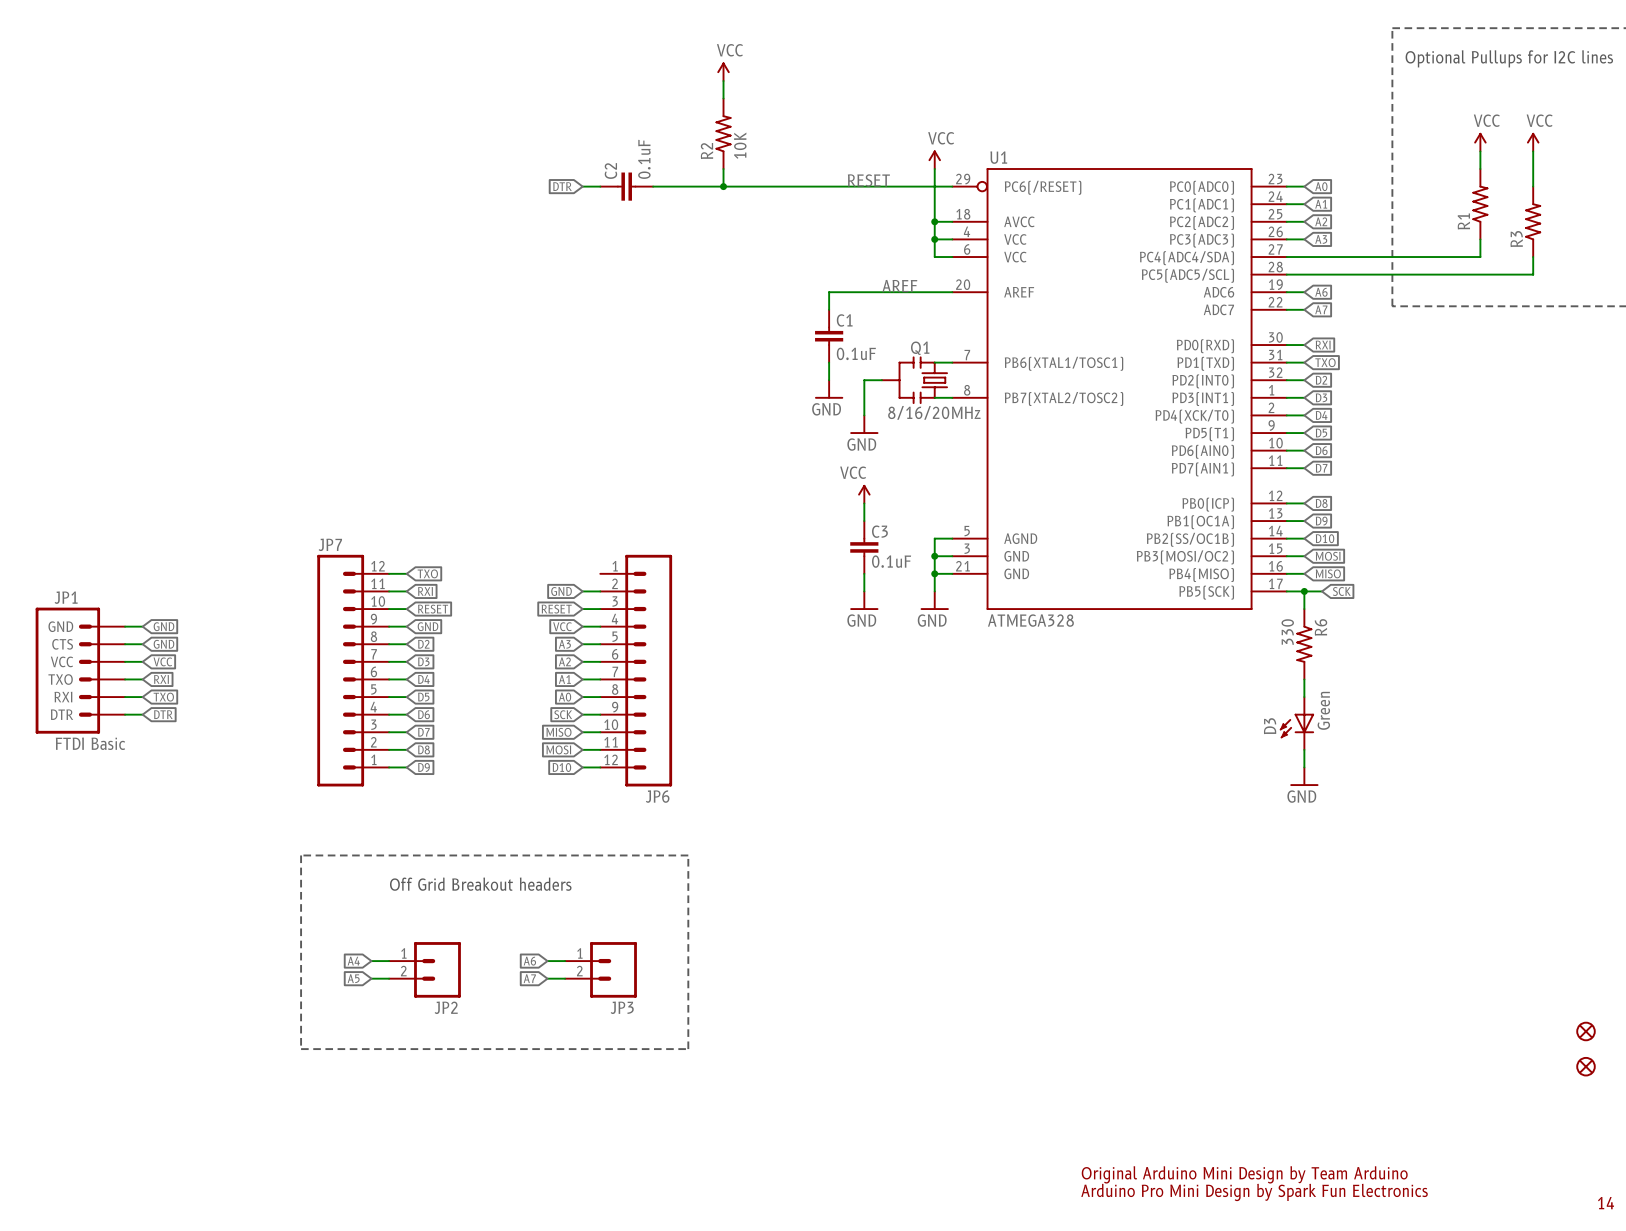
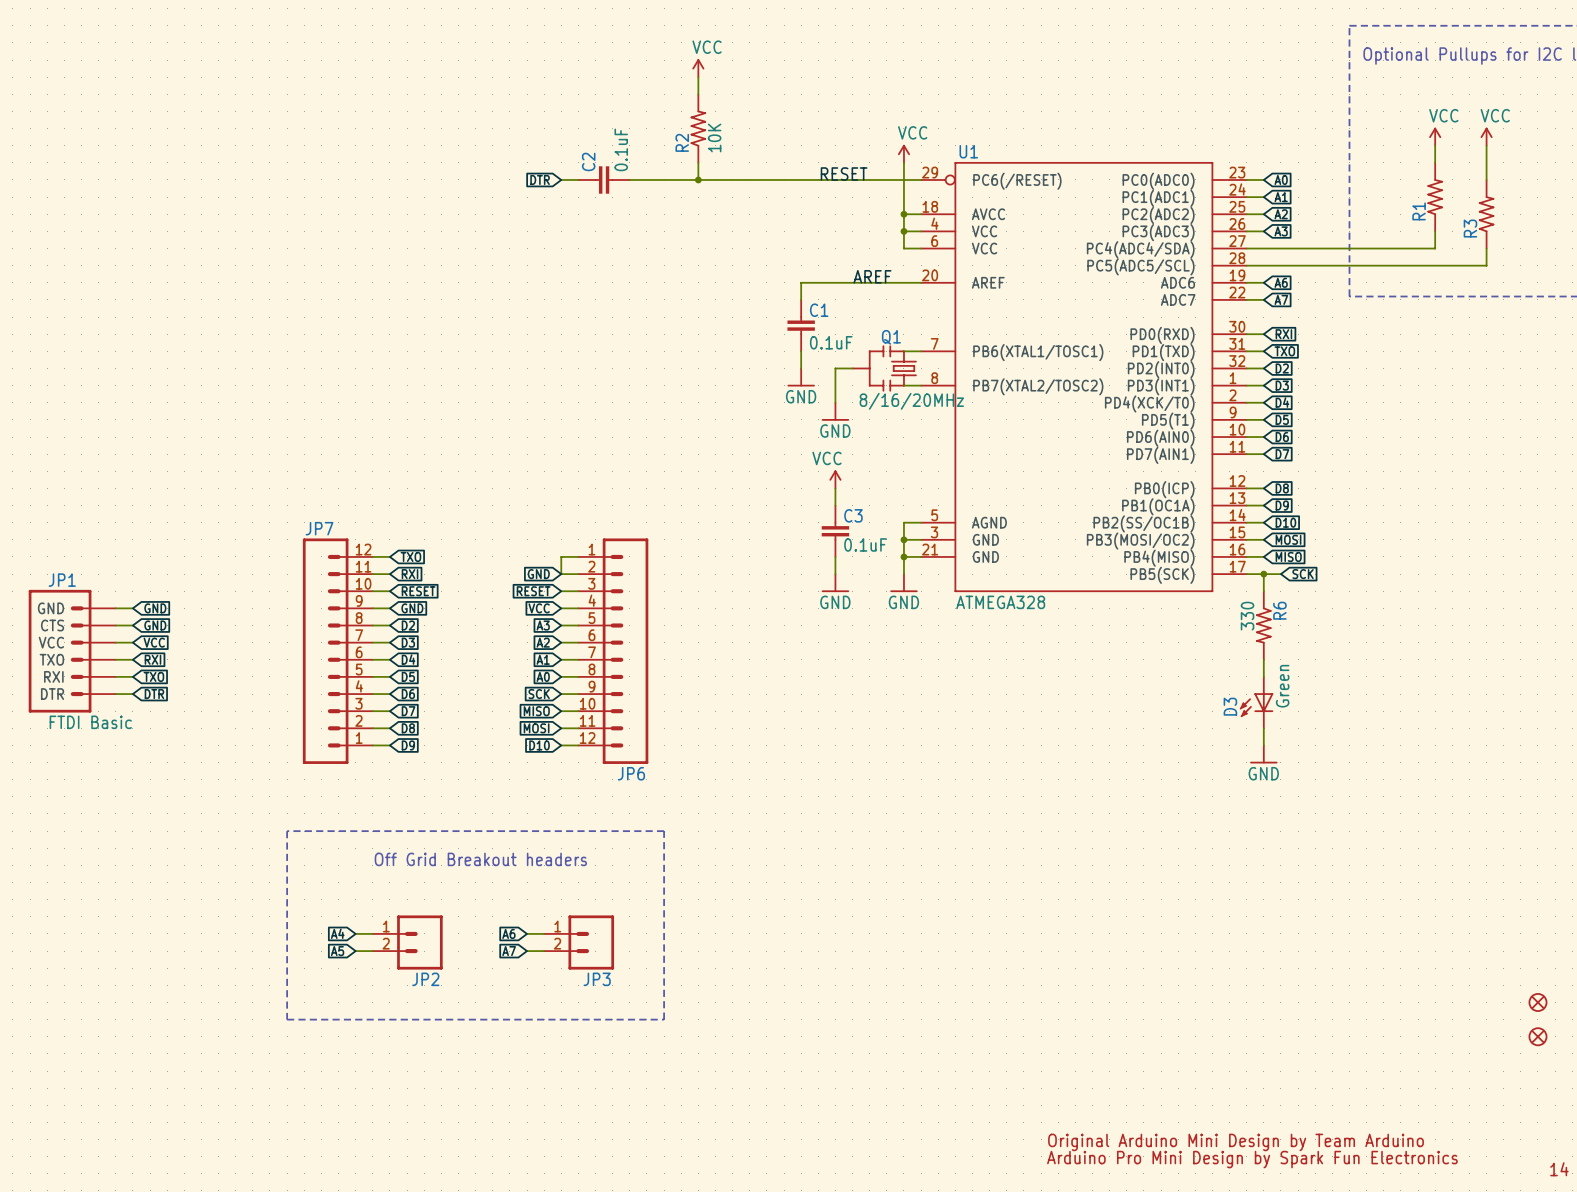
wire: none -> (578, 556) (561, 556) (561, 574)

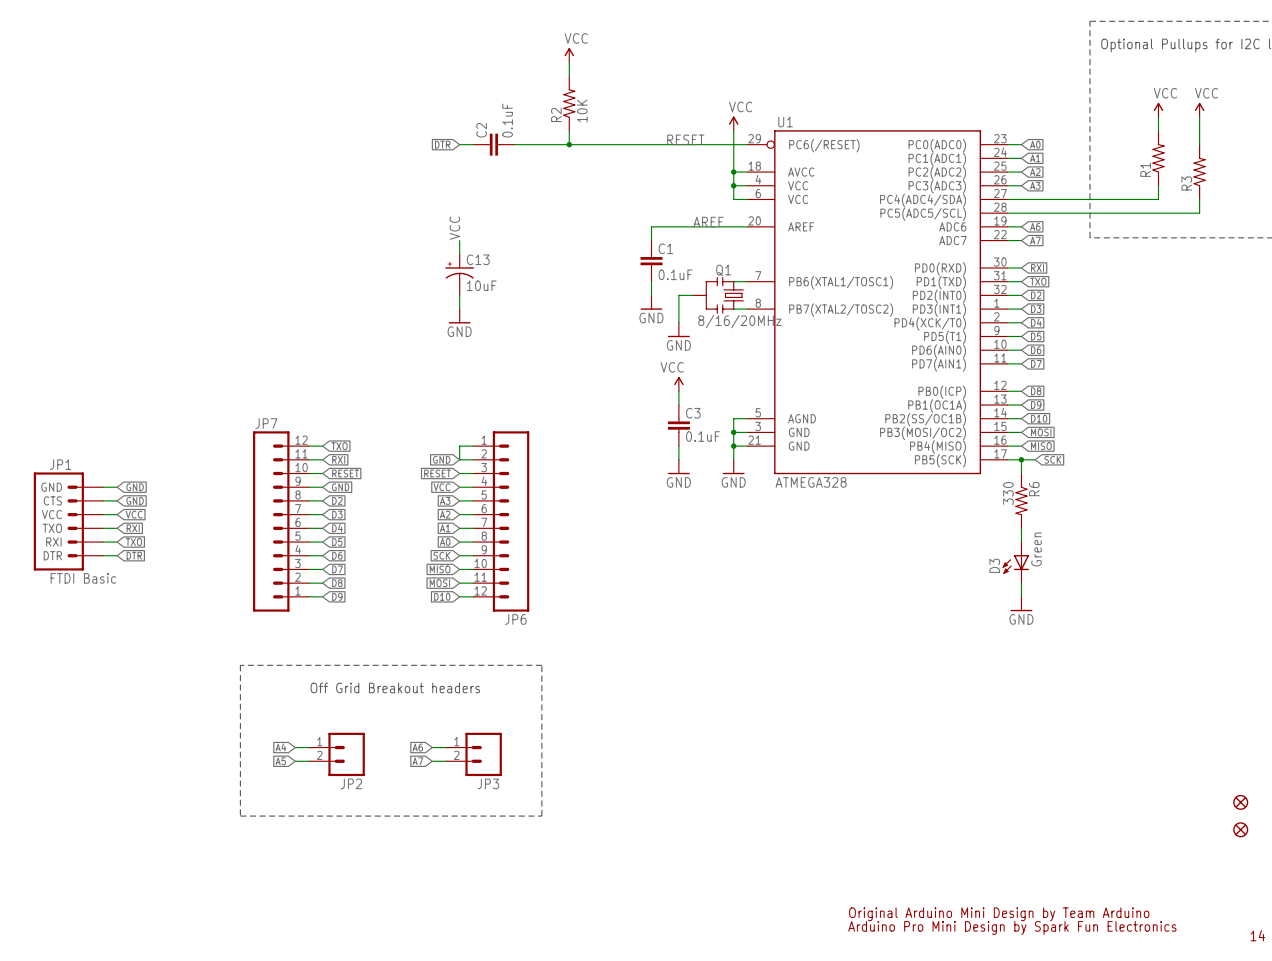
label: none -> VCC (454, 228)
wire: none -> (459, 240) (459, 254)
C13: none -> 10uF (459, 274)
wire: none -> (459, 295) (459, 309)
power symbol: none -> GND (459, 316)

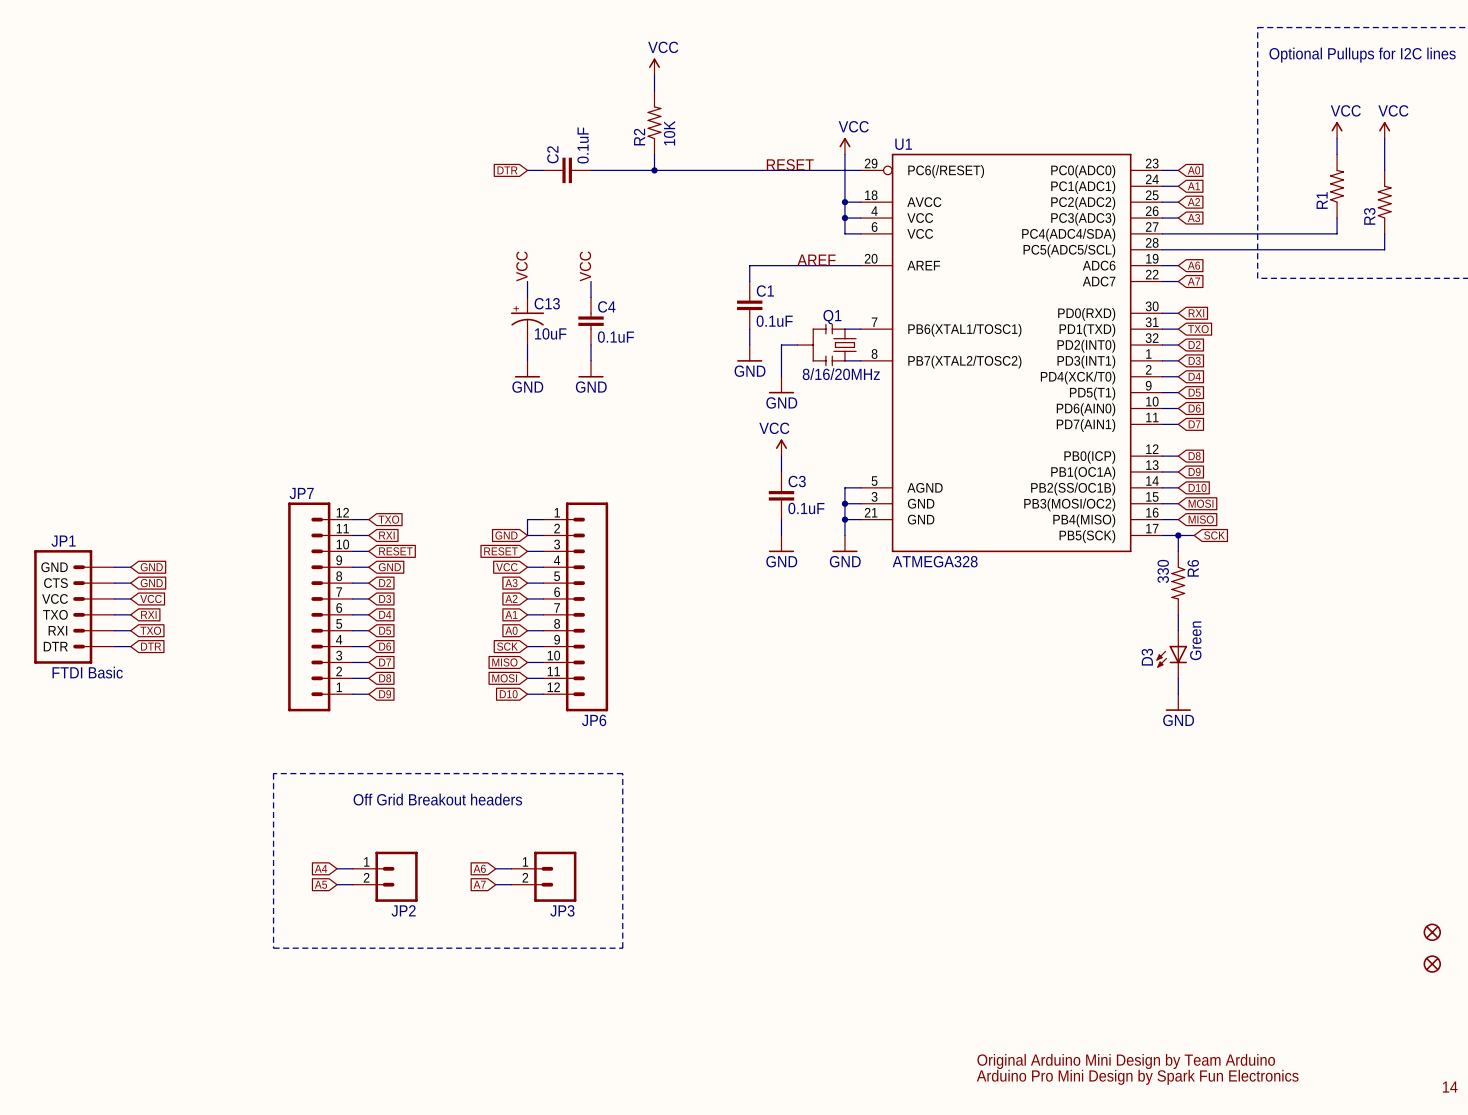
label: none -> VCC (585, 266)
wire: none -> (591, 281) (591, 297)
C4: none -> 0.1uF (591, 321)
wire: none -> (591, 345) (591, 360)
power symbol: none -> GND (591, 369)

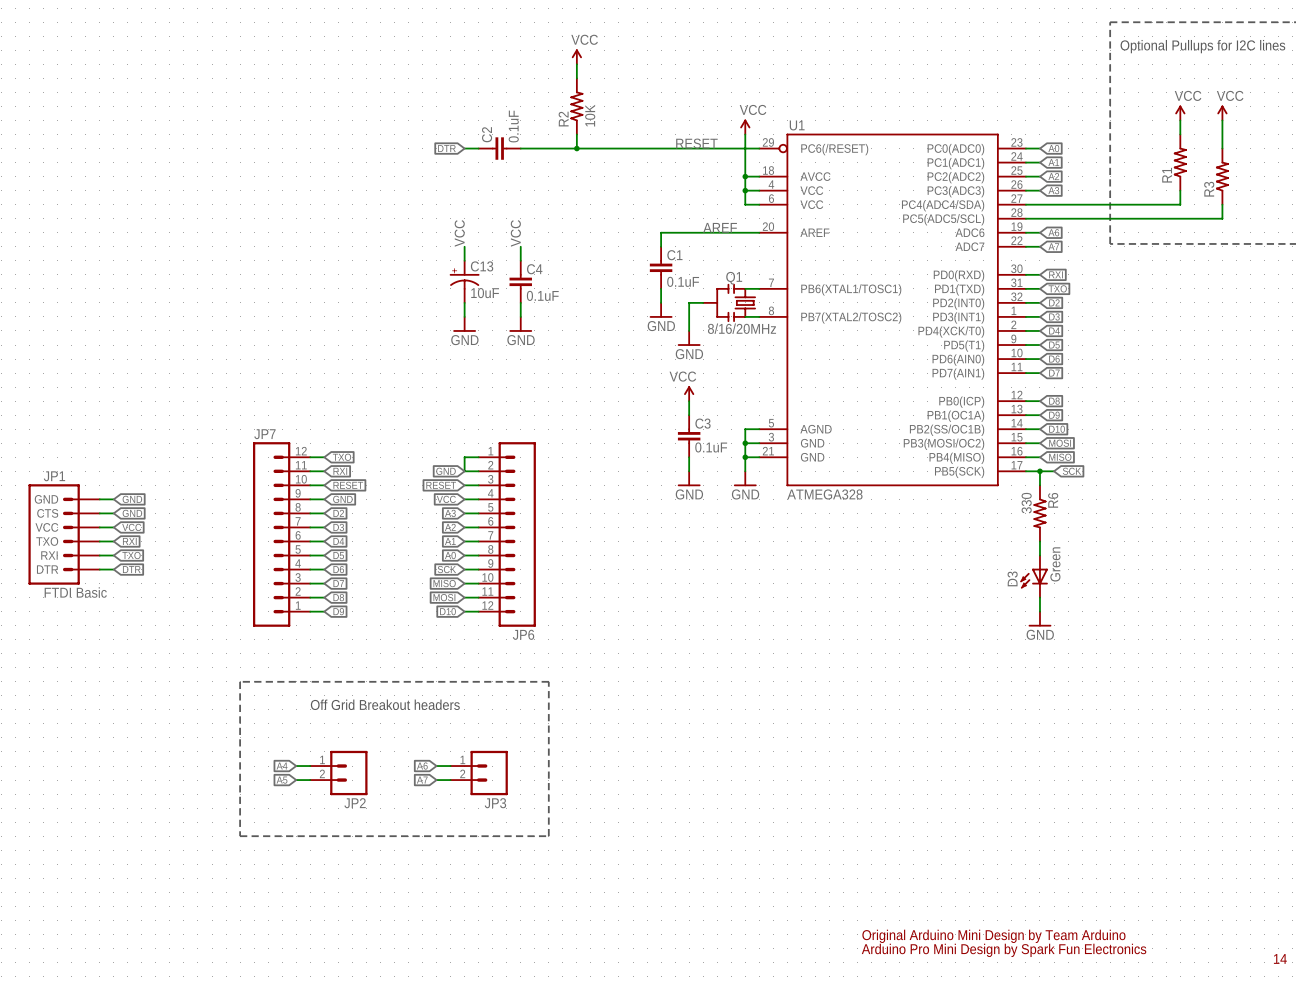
part: (1432, 932) -> none
part: (1432, 964) -> none

